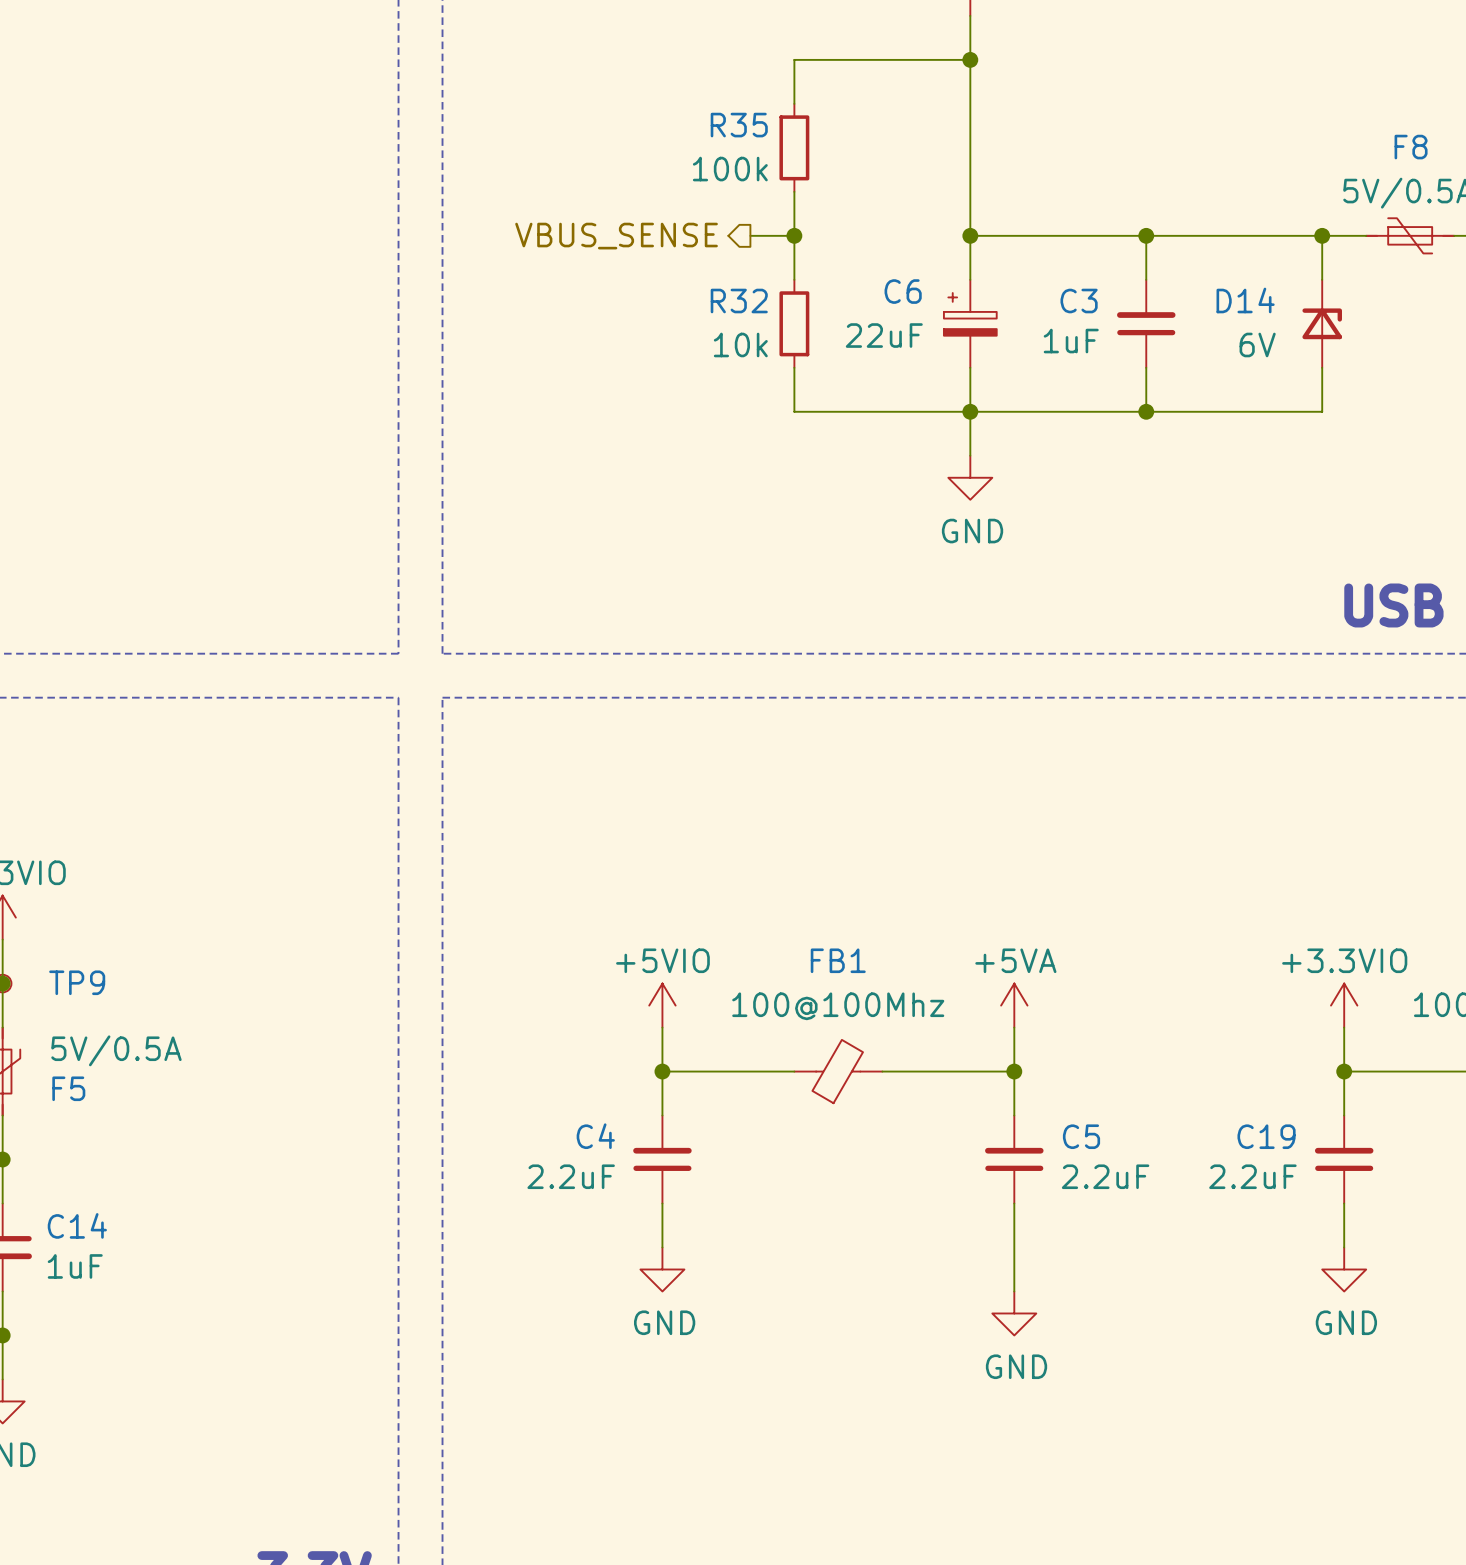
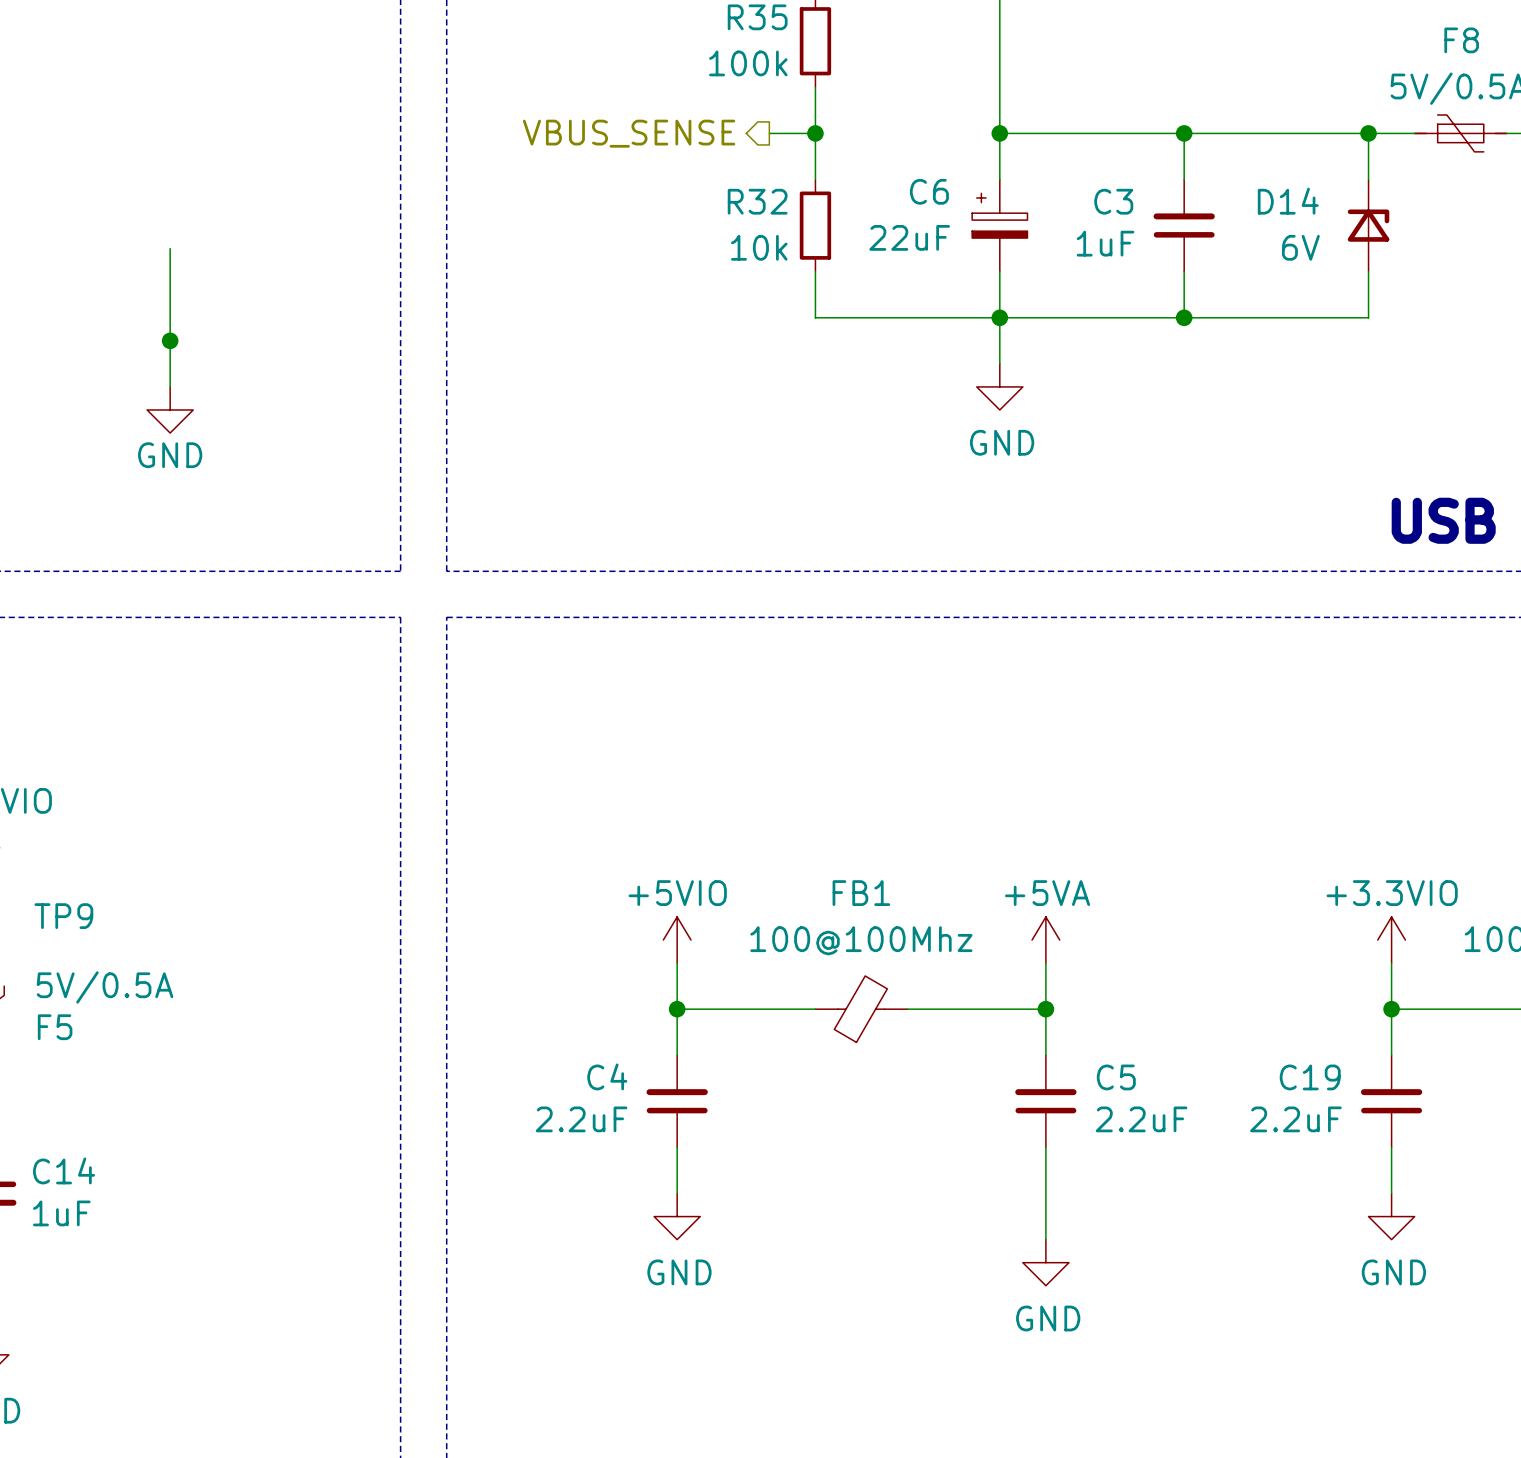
wire: none -> (170, 248) (170, 386)
junction: none -> (170, 340)
power symbol: none -> GND (170, 409)

